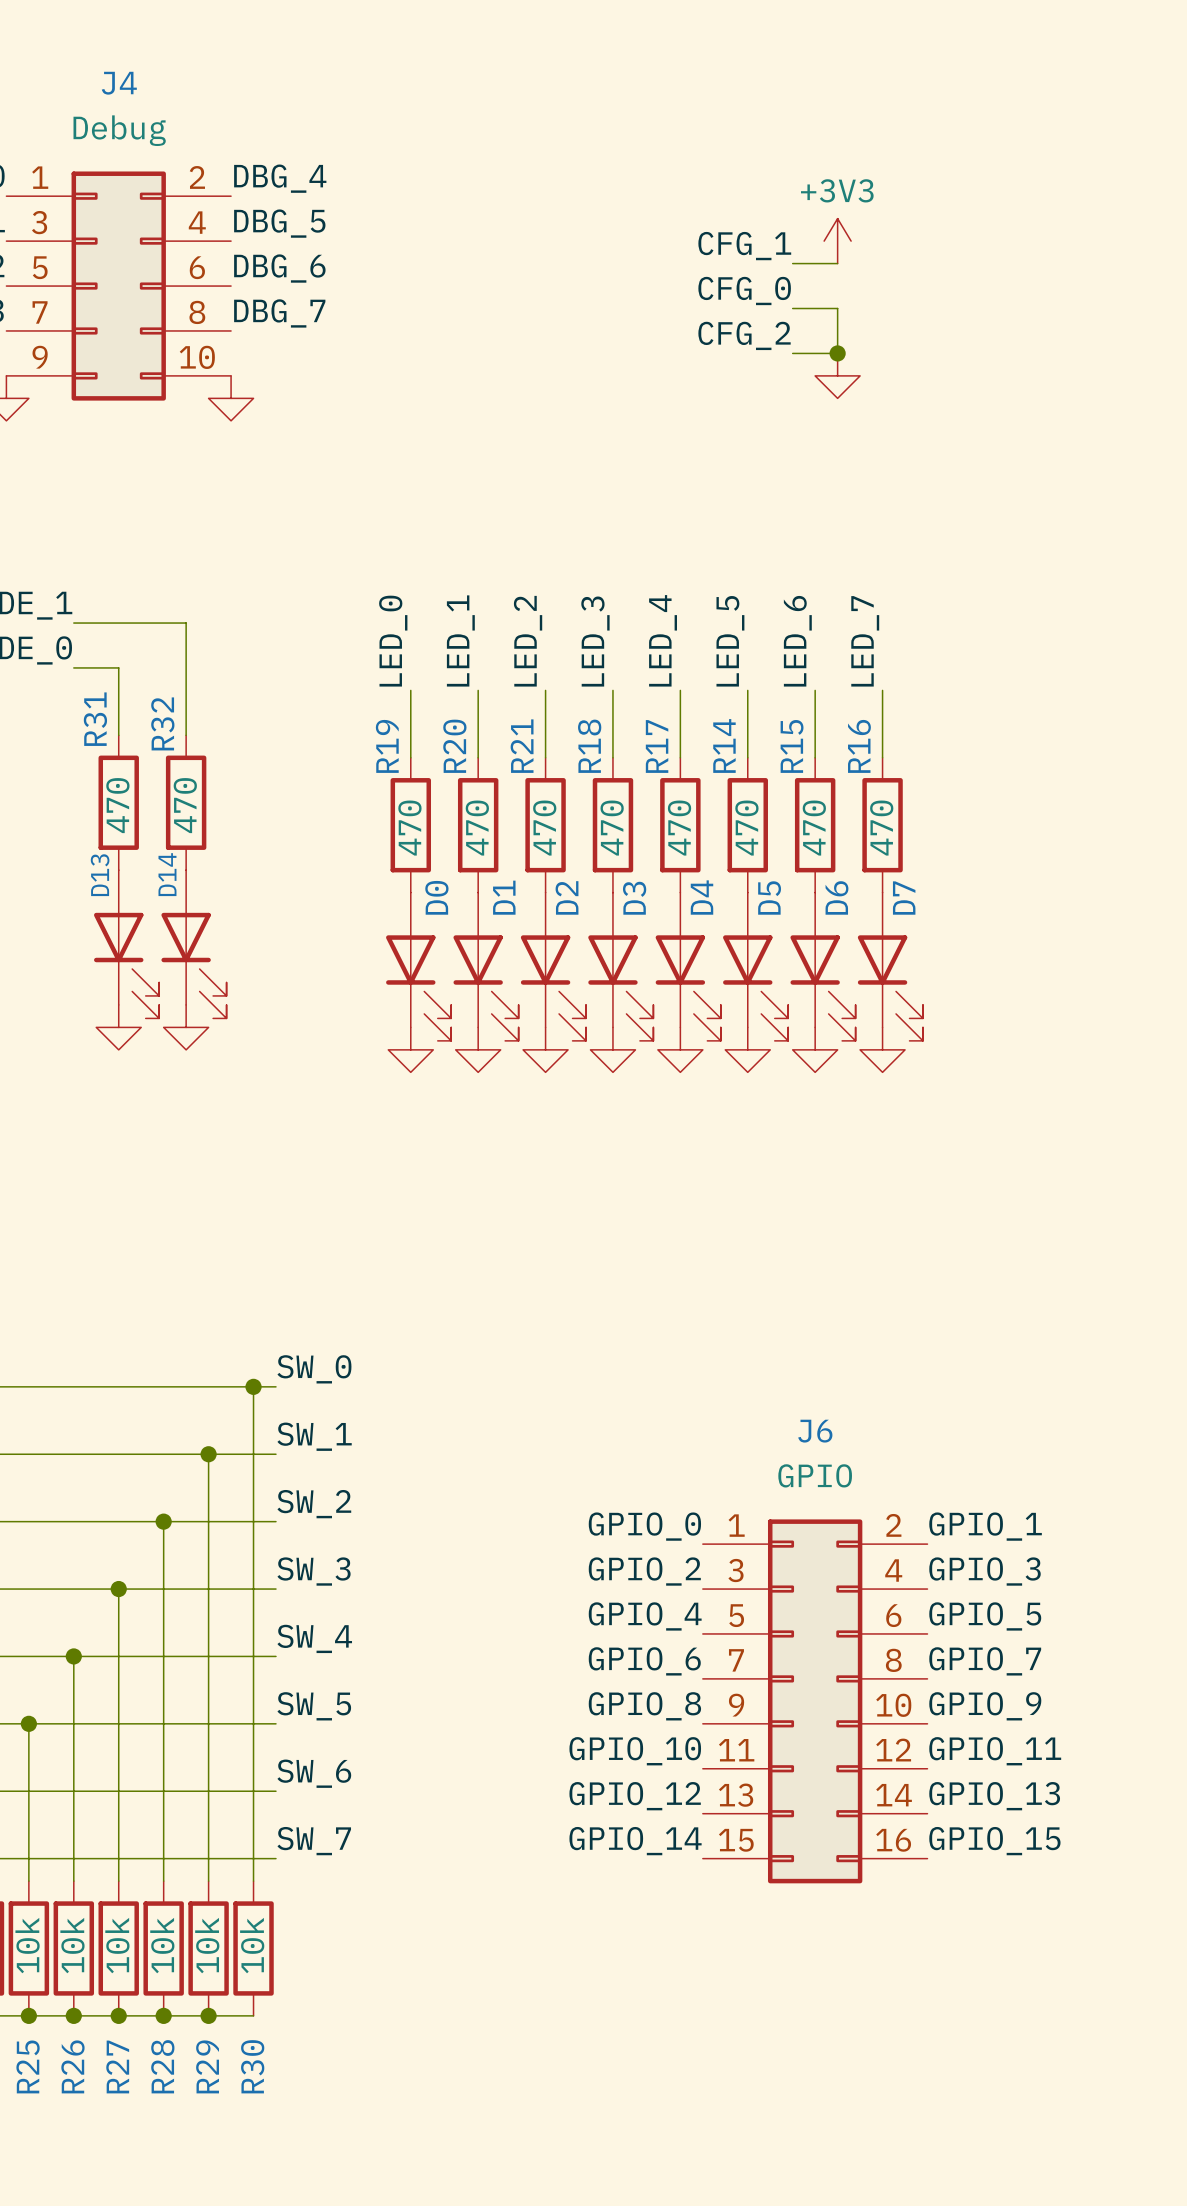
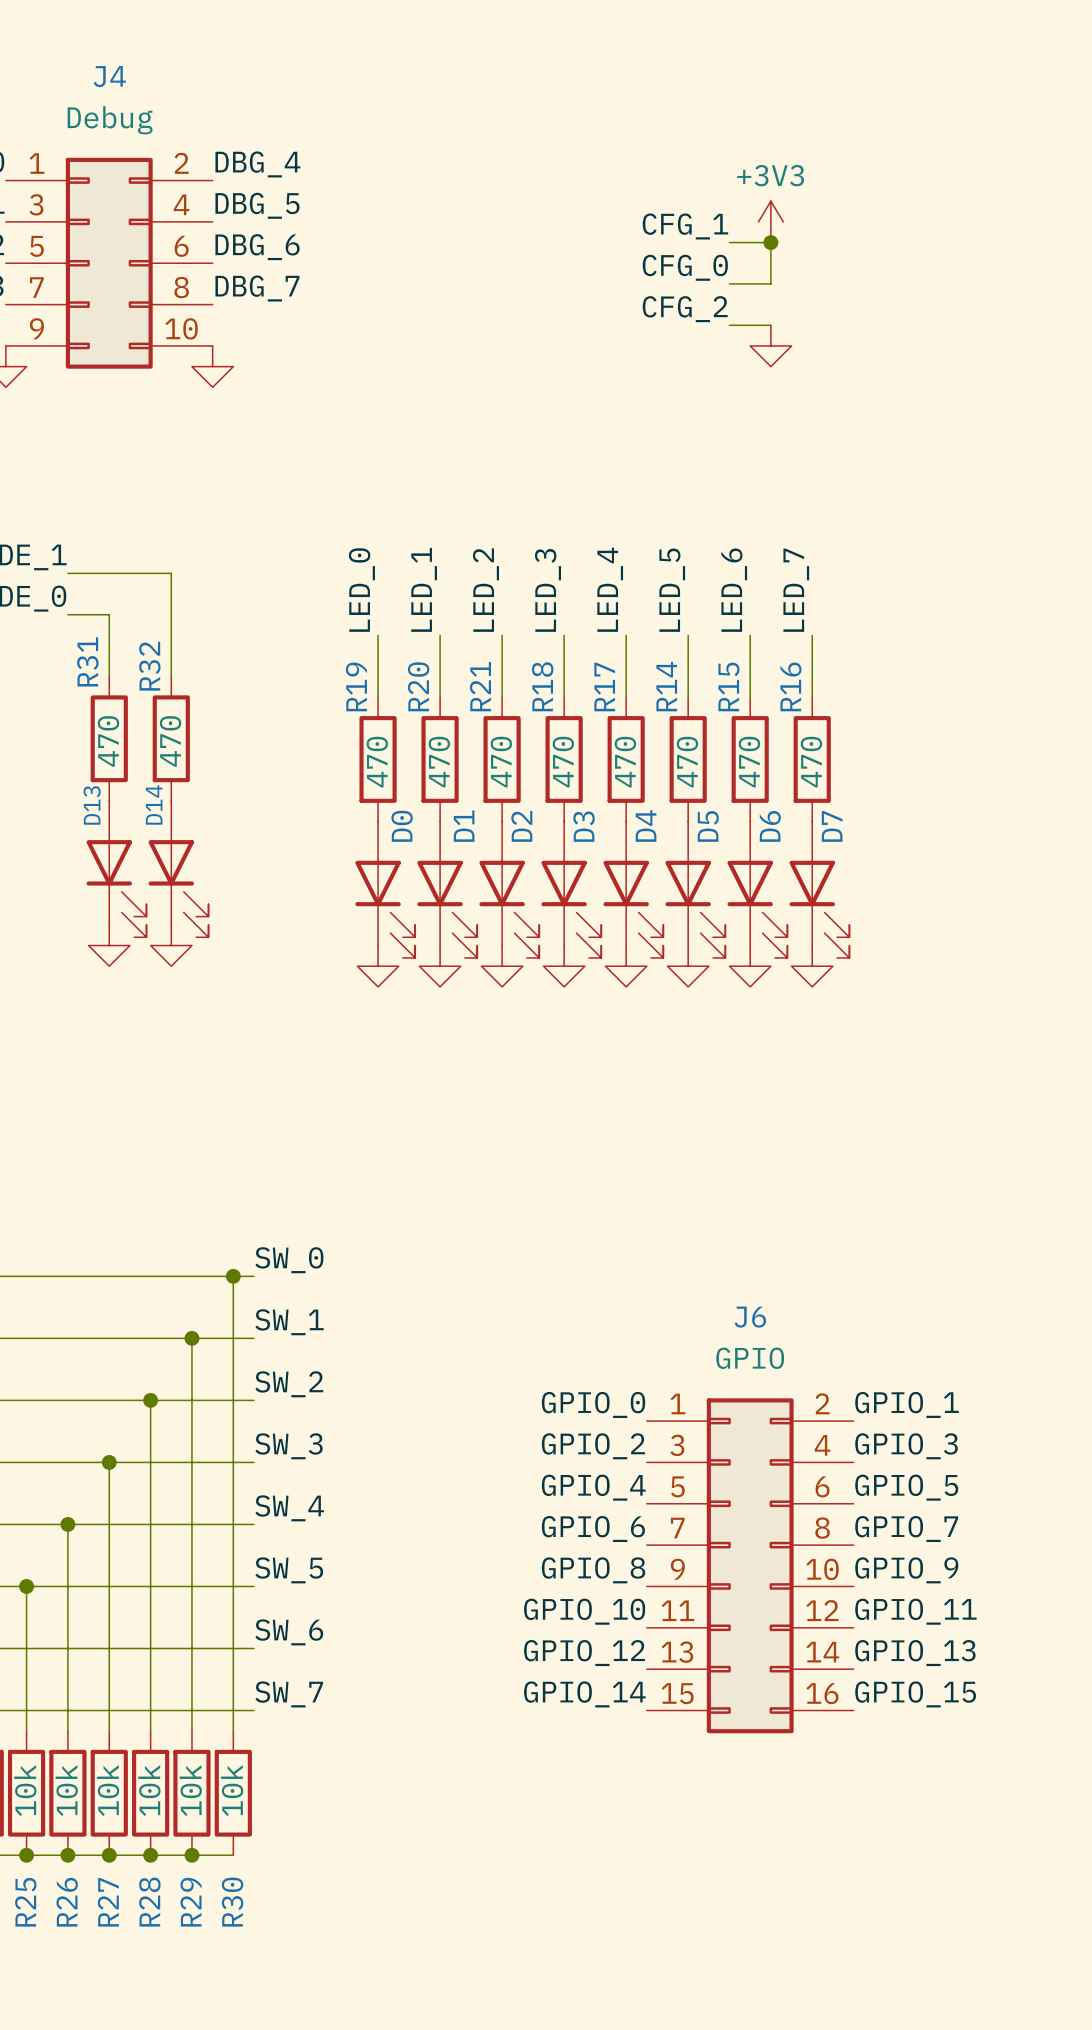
wire: (837, 308) (837, 353) -> (770, 283) (770, 242)
junction position: (837, 353) -> (770, 242)

